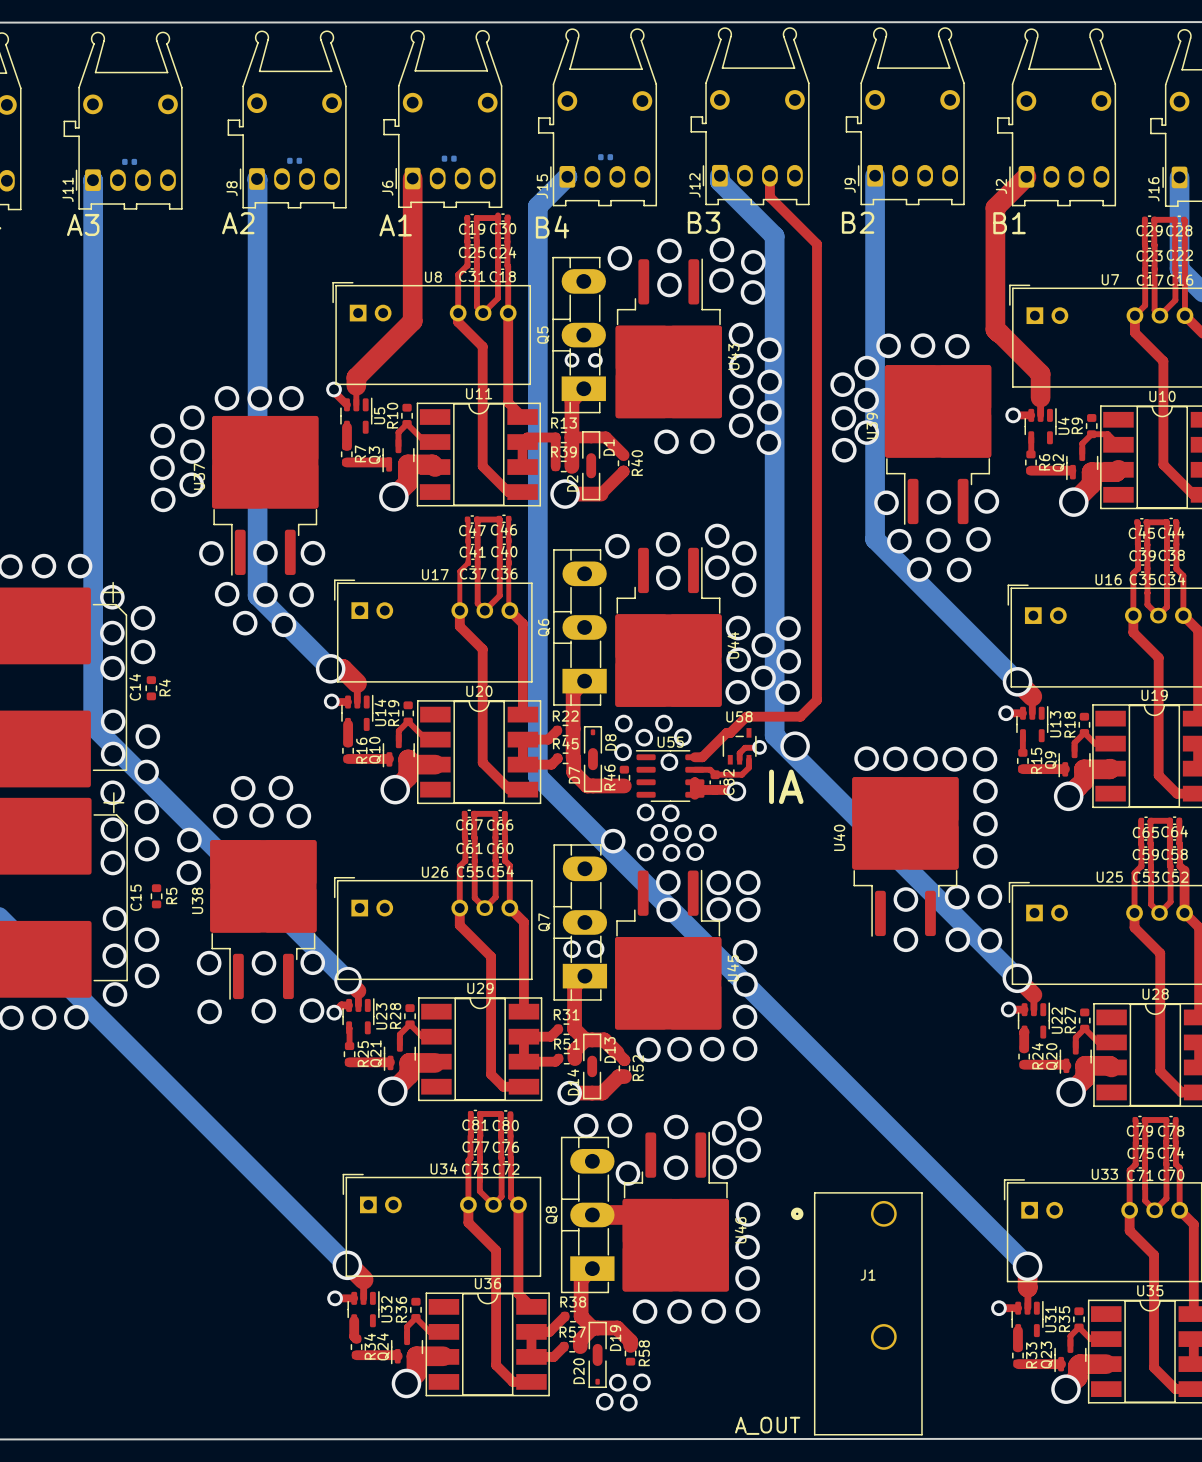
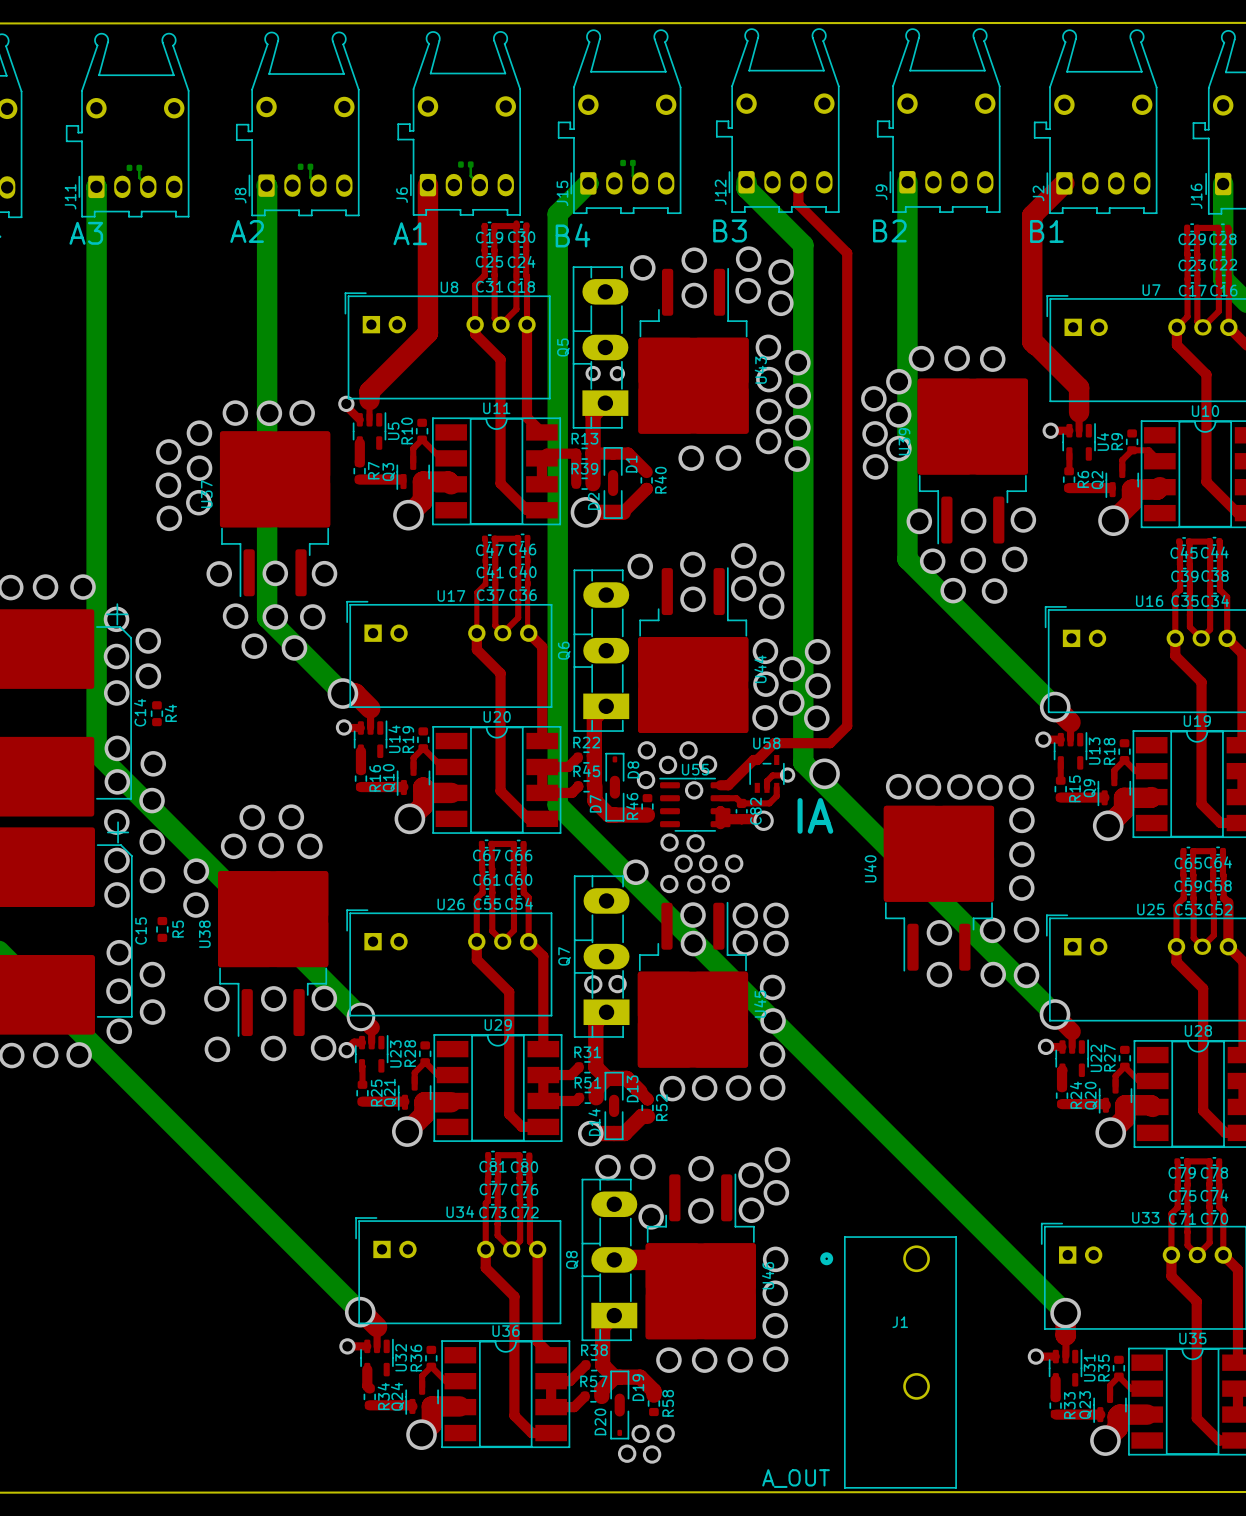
bottom track: none -> (632, 163) (632, 176) (640, 183)
bottom track: none -> (470, 164) (470, 176) (479, 185)
bottom track: none -> (310, 166) (310, 177) (318, 185)
bottom track: none -> (139, 167) (139, 177) (148, 186)

